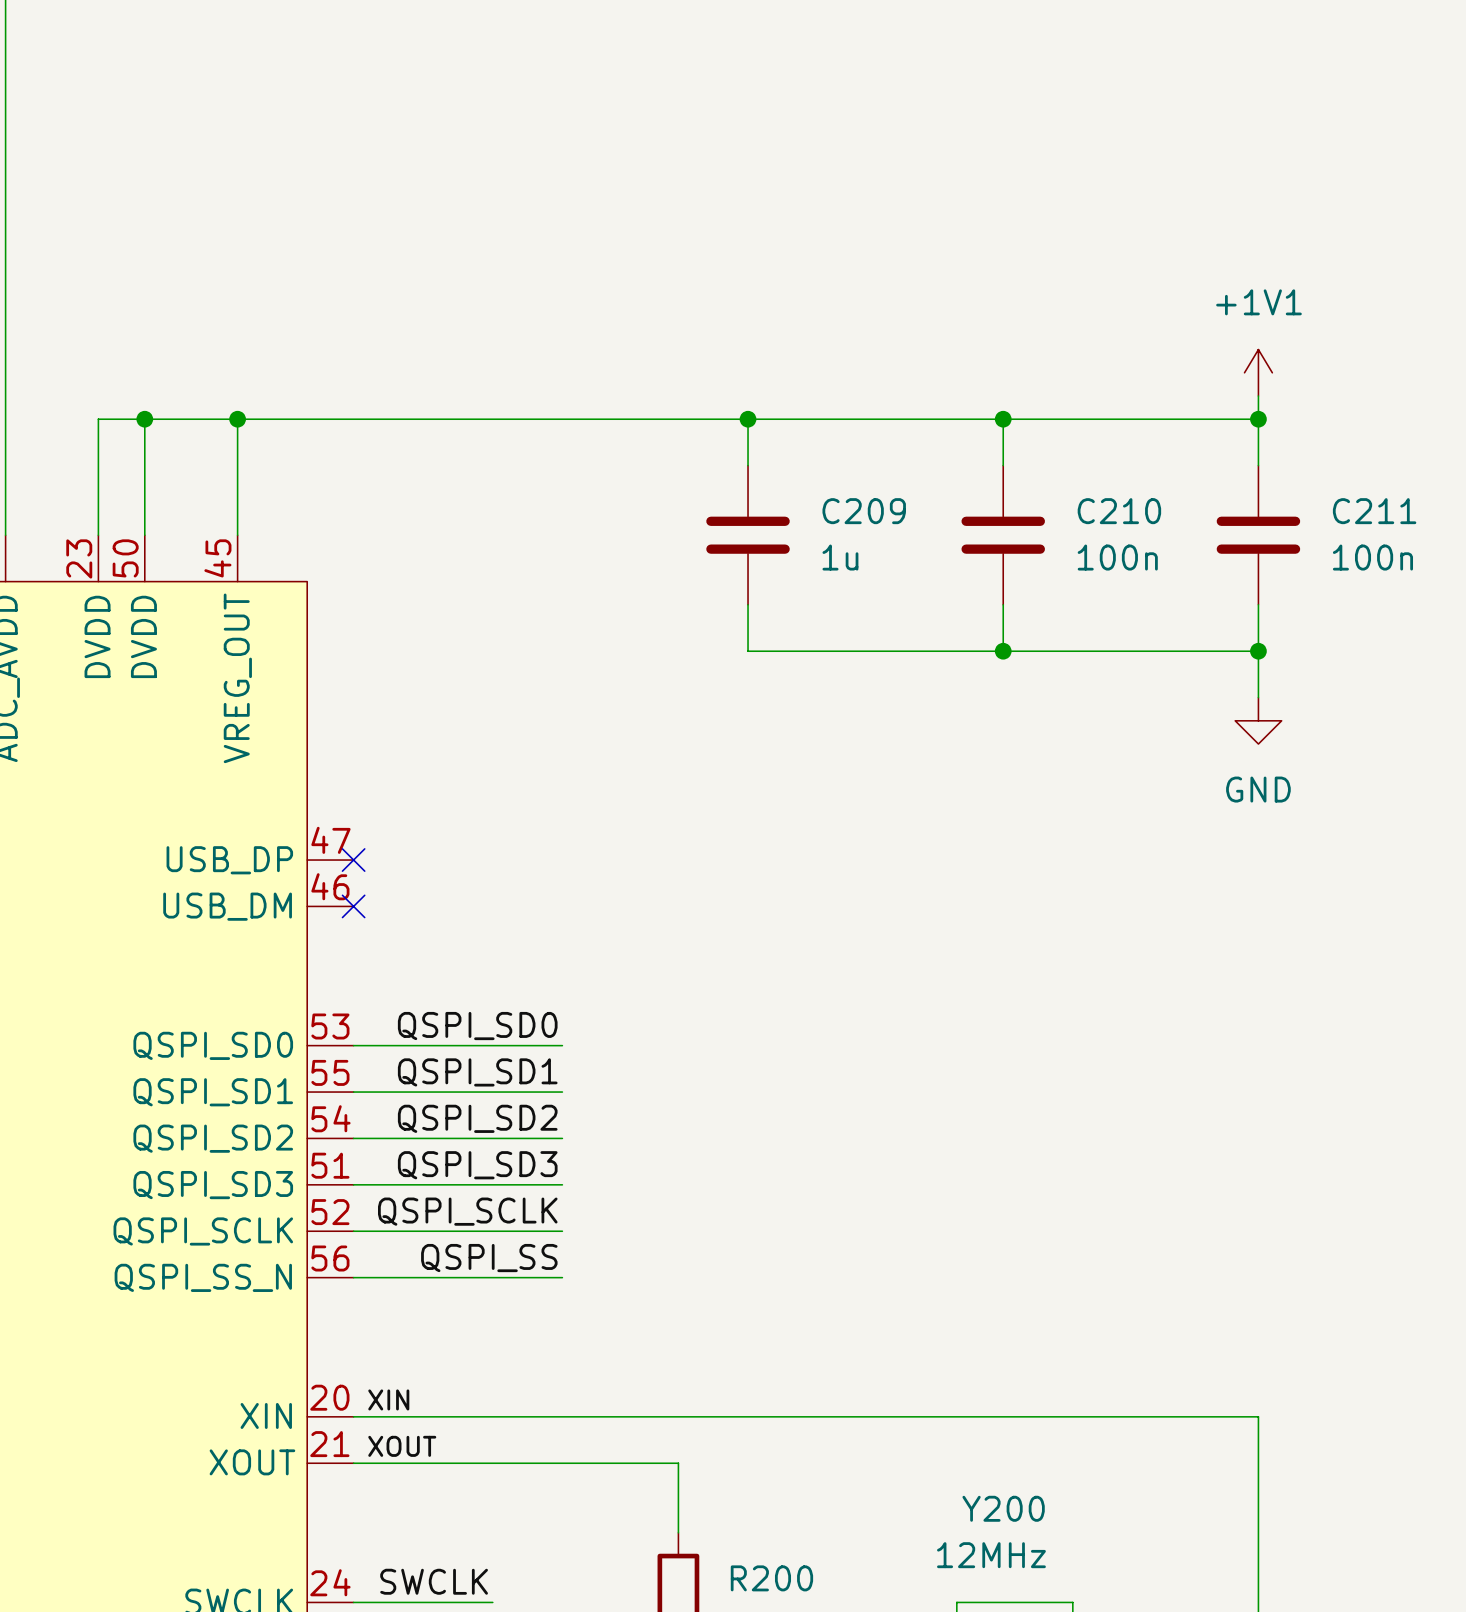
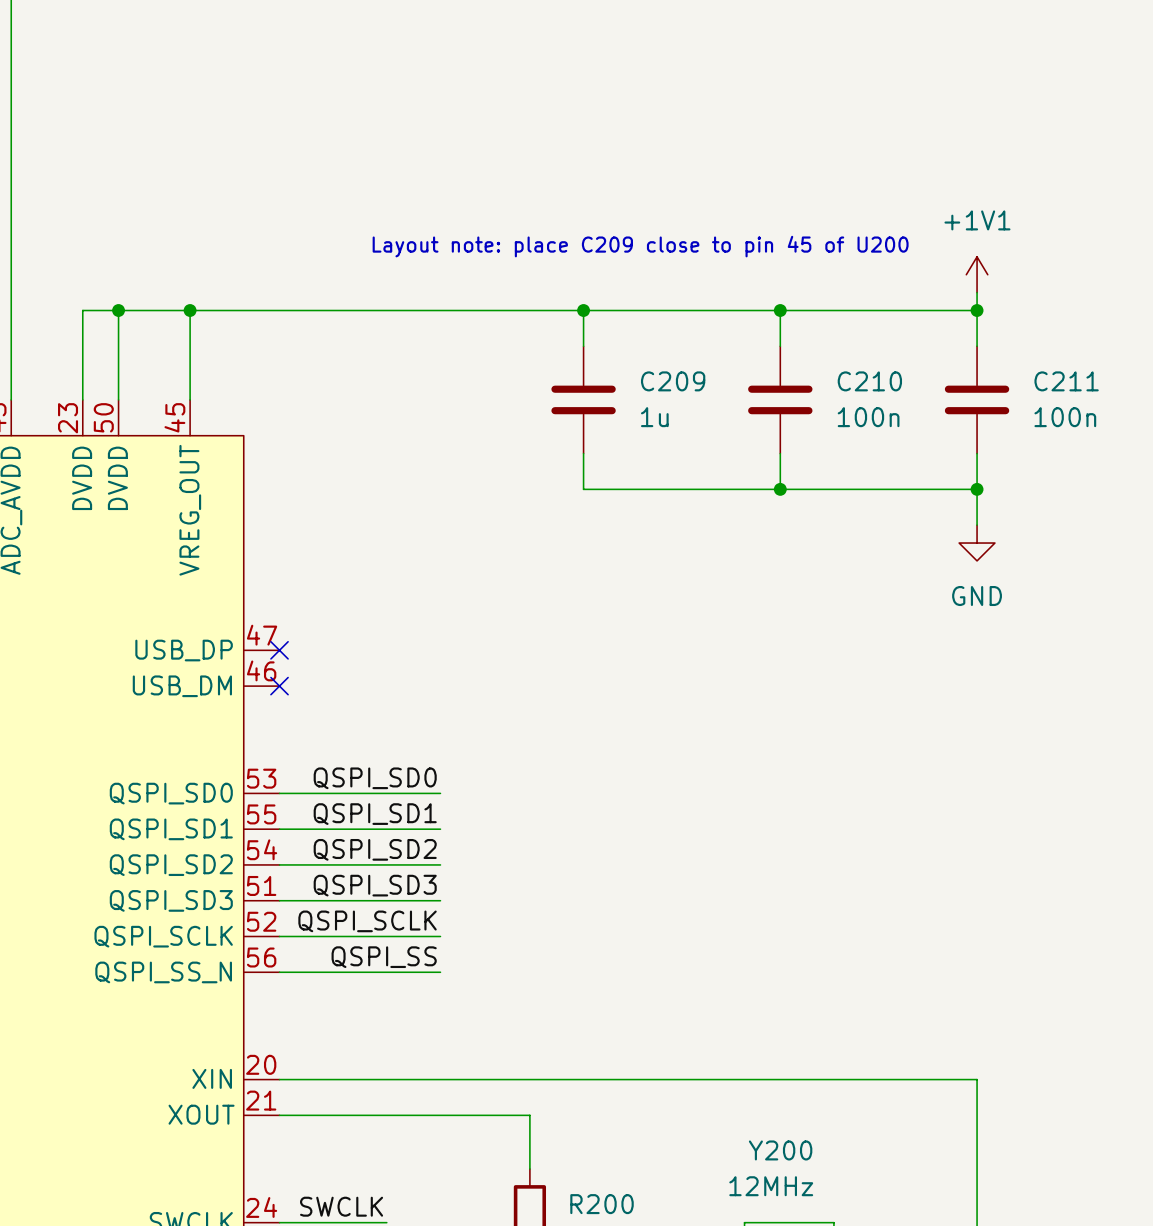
text: none -> Layout note: place C209 close to pin 45 of U200 (640, 246)
label: XIN (388, 1399) -> none
label: XOUT (402, 1446) -> none

